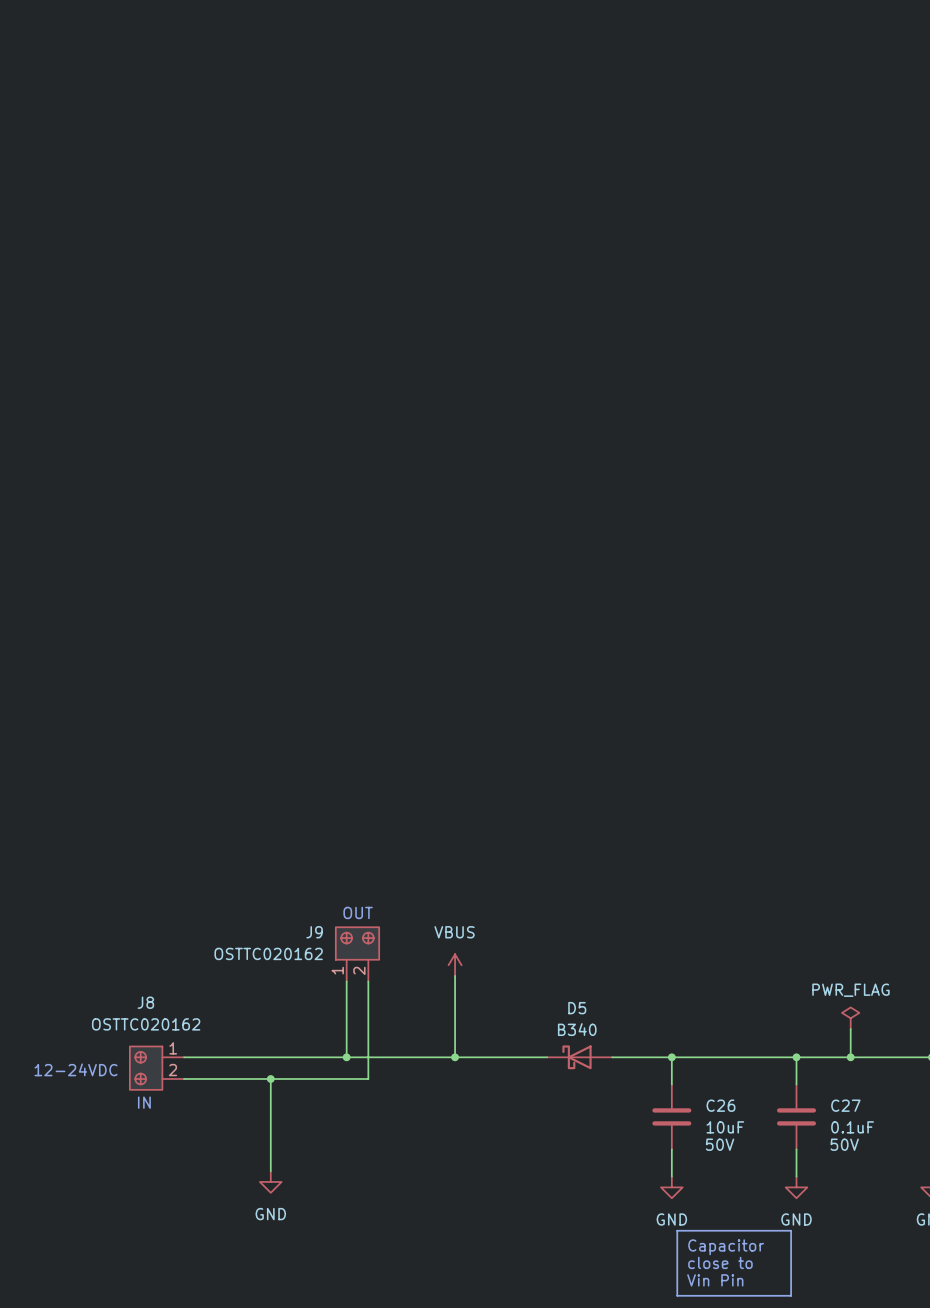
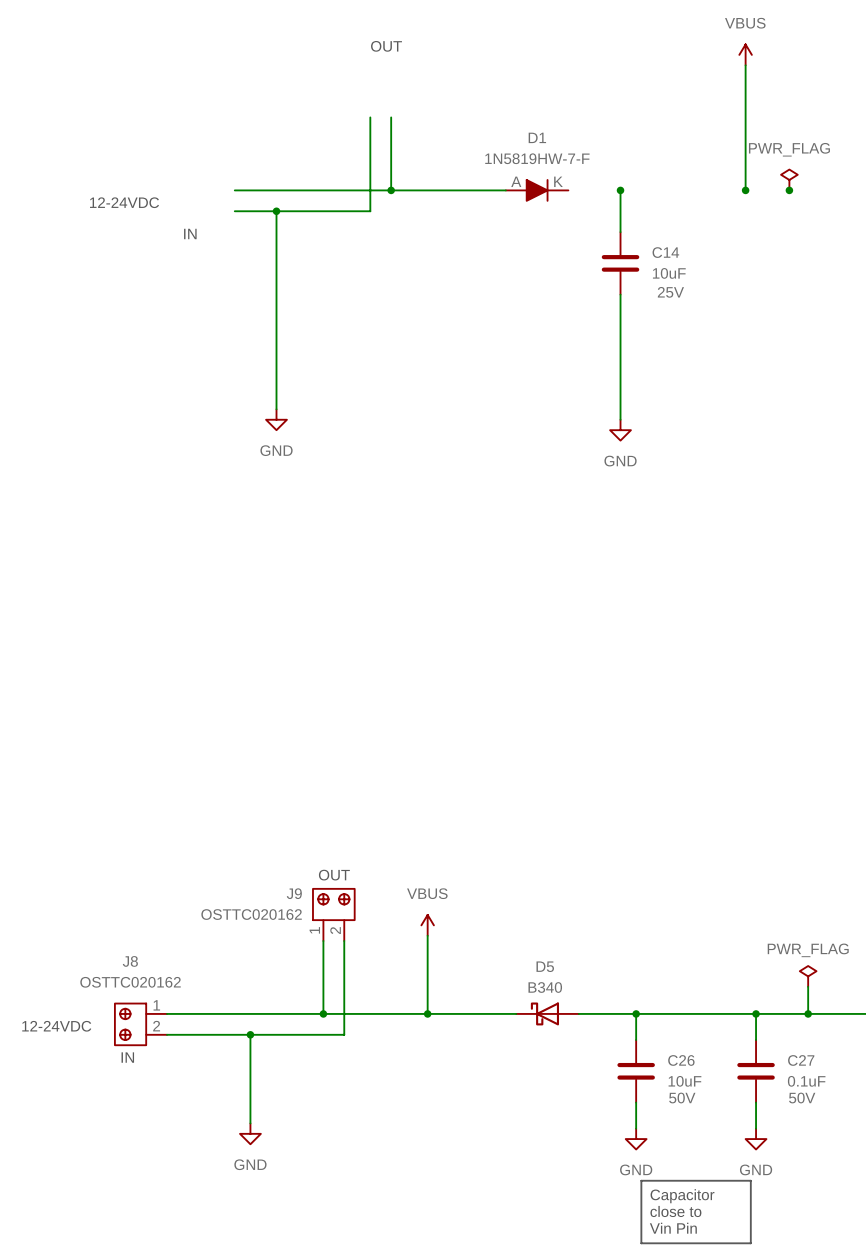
text: none -> OUT (386, 46)
power symbol: none -> VBUS (745, 54)
wire: none -> (745, 65) (745, 190)
wire: none -> (370, 117) (370, 211) (234, 211)
wire: none -> (391, 117) (391, 190)
power symbol: none -> PWR_FLAG (789, 179)
wire: none -> (234, 190) (505, 190)
junction: none -> (391, 190)
D1: none -> 1N5819HW-7-F (537, 190)
wire: none -> (620, 190) (620, 232)
junction: none -> (620, 190)
junction: none -> (745, 190)
junction: none -> (789, 190)
text: none -> 12-24VDC (124, 202)
wire: none -> (276, 211) (276, 409)
junction: none -> (276, 211)
text: none -> IN (190, 233)
C14: none -> 10uF (620, 263)
wire: none -> (620, 294) (620, 419)
power symbol: none -> GND (276, 419)
power symbol: none -> GND (620, 430)

